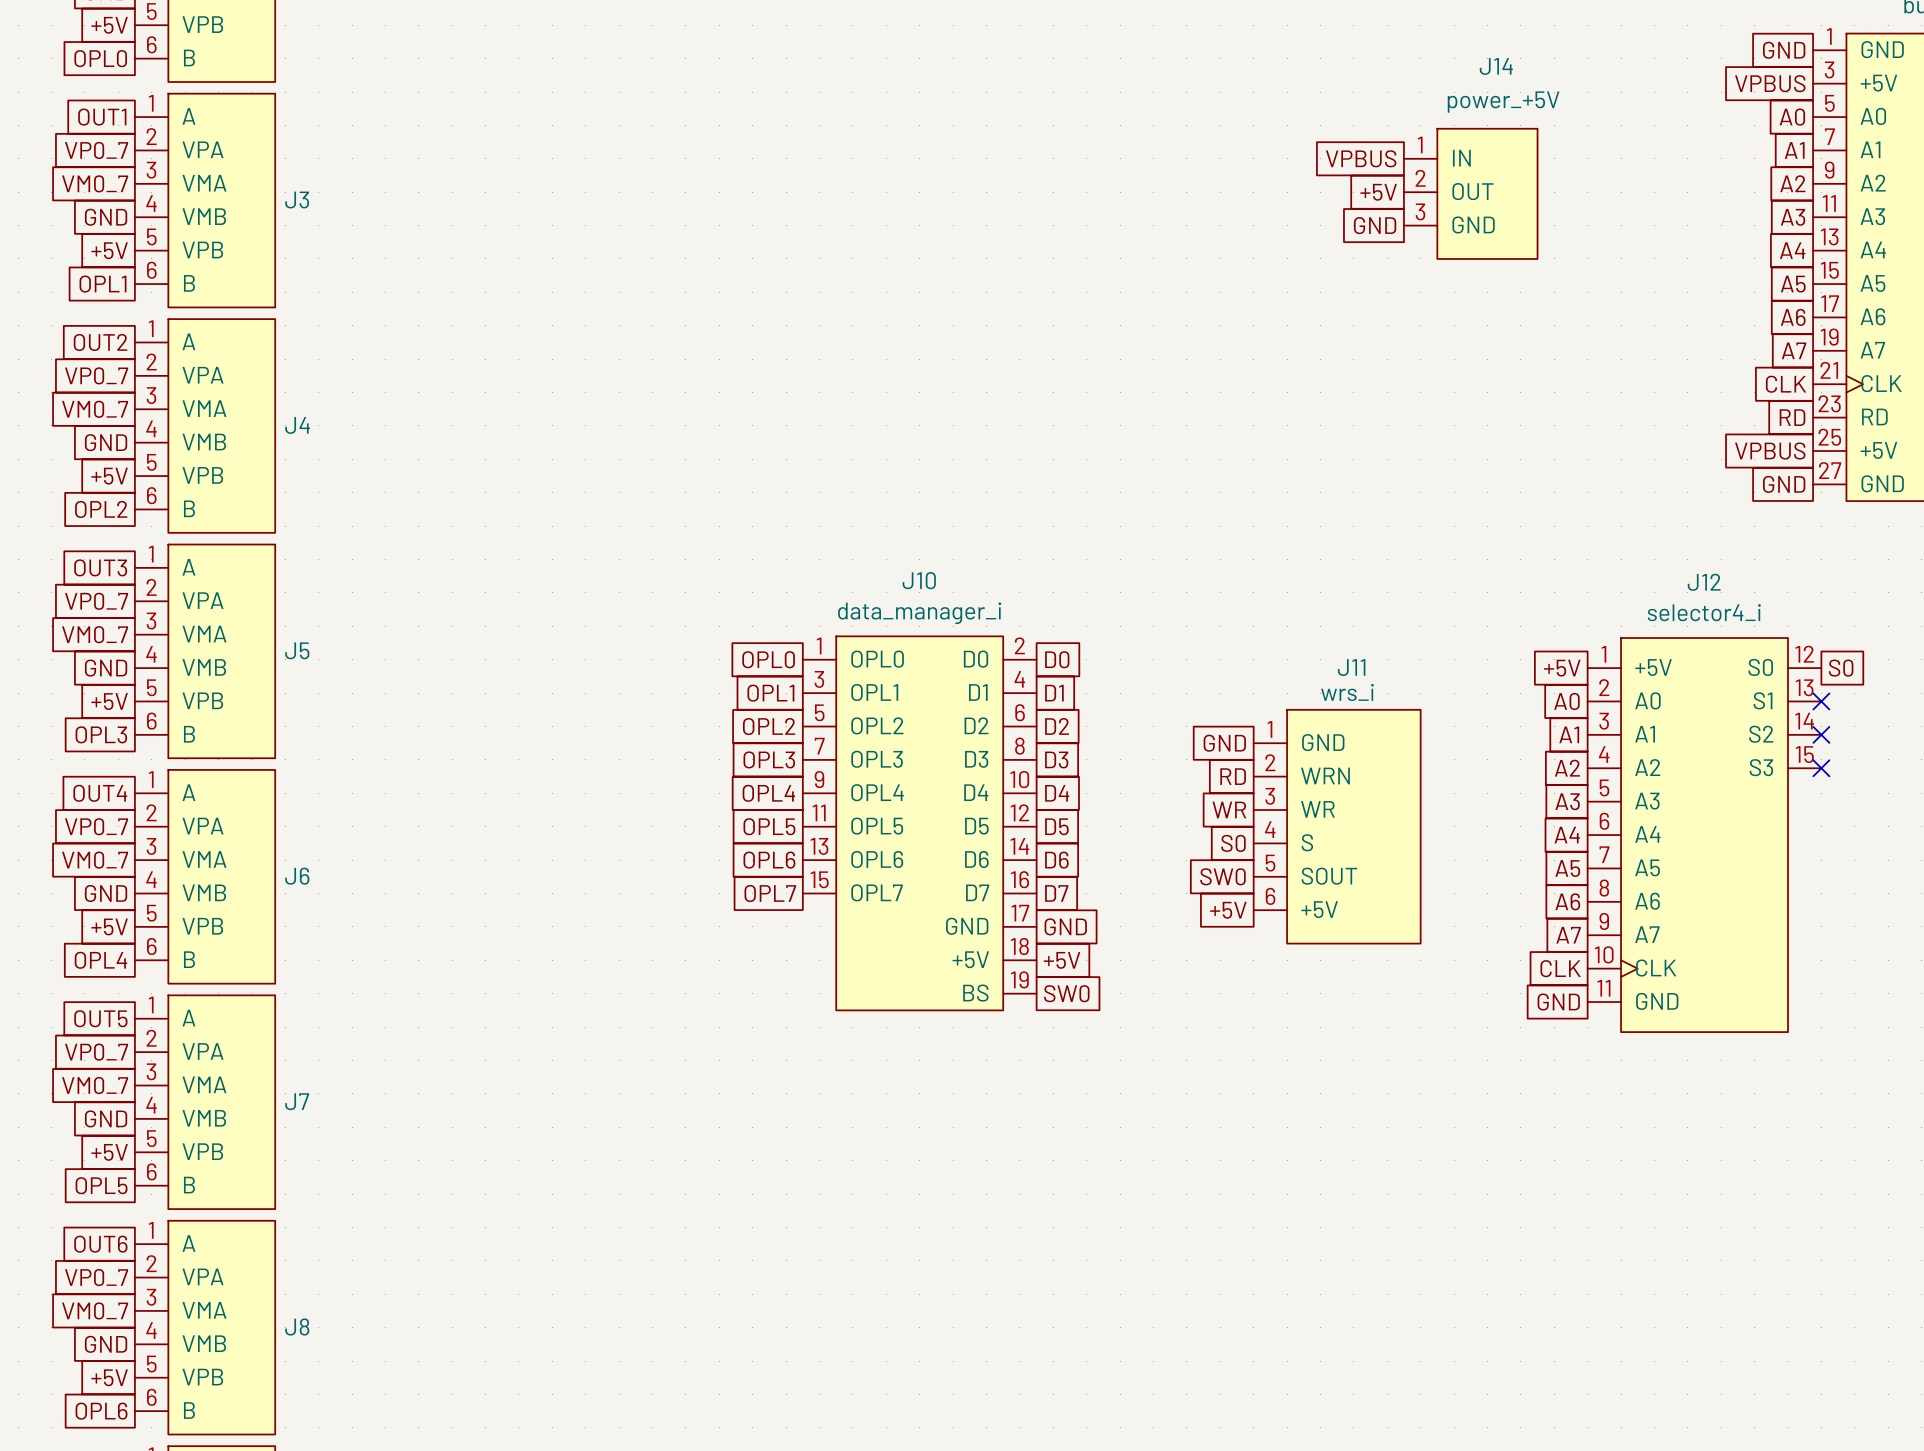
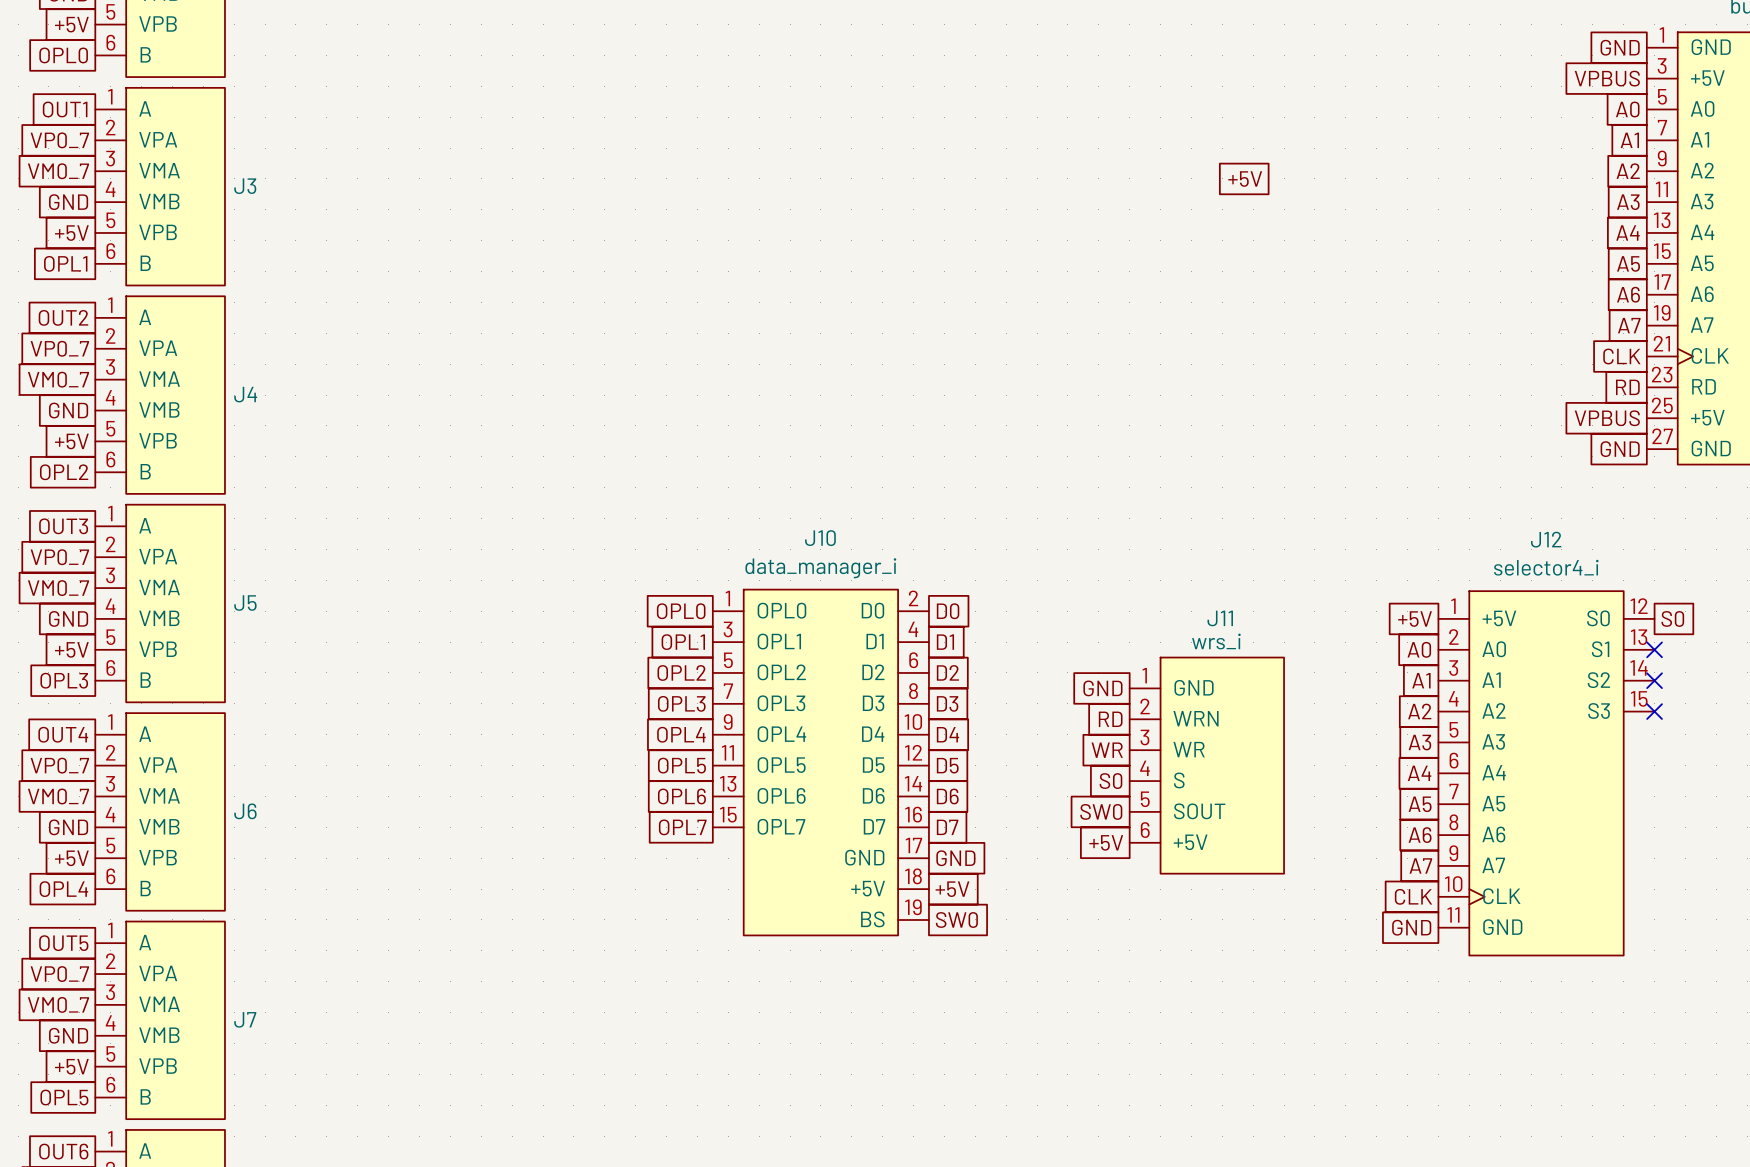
global label: VPBUS (1361, 158) -> none
J14: power_+5V (1470, 193) -> none
global label: GND (1375, 225) -> none

